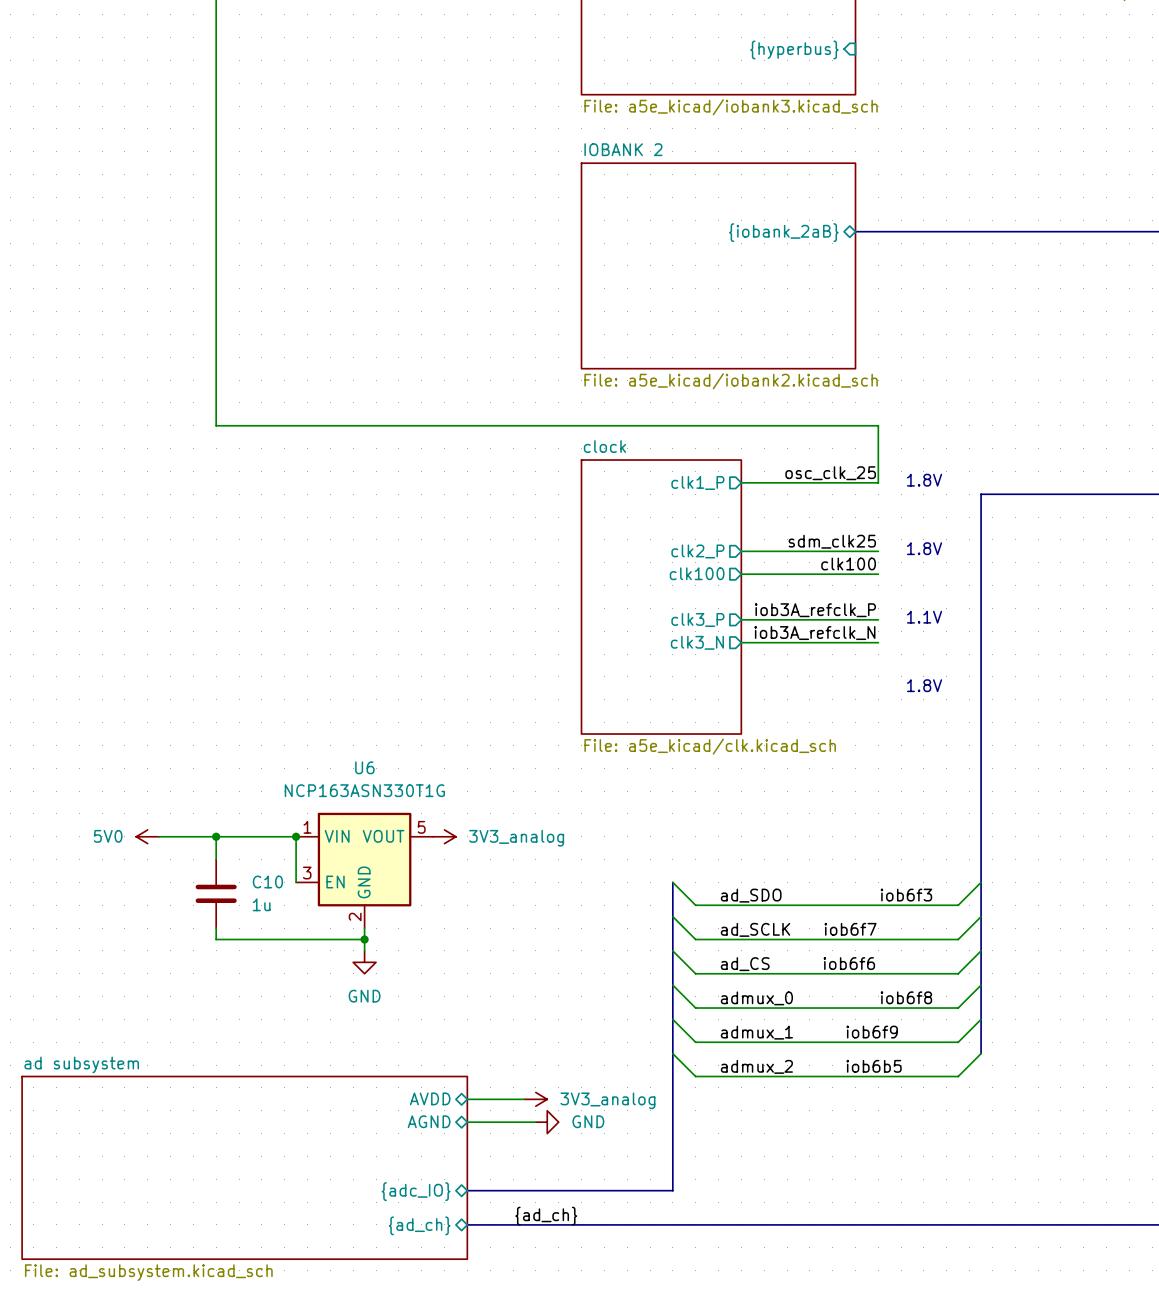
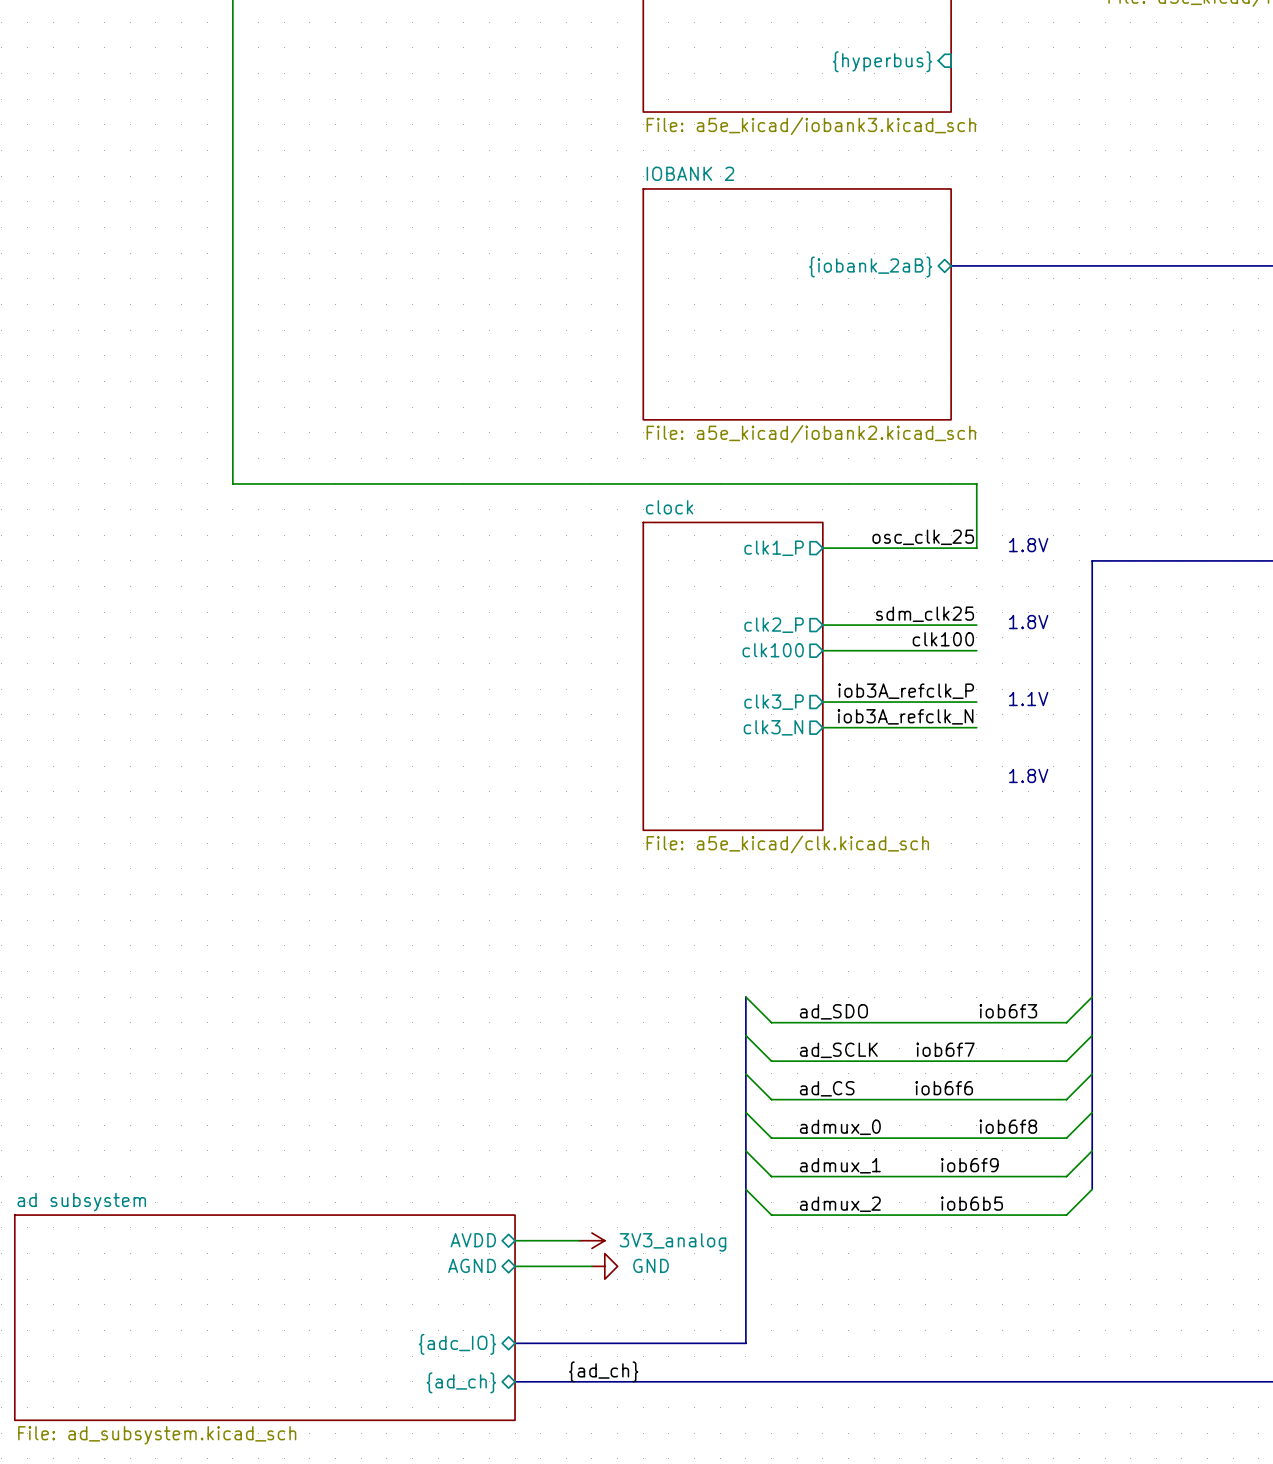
power symbol: 5V0 (147, 836) -> none
wire: (159, 836) (296, 836) (296, 882) -> none
wire: (216, 836) (216, 859) -> none
junction: (216, 836) -> none
junction: (296, 836) -> none
power symbol: 3V3_analog (444, 836) -> none
U6: NCP163ASN330T1G (364, 870) -> none
C10: 1u (216, 893) -> none
wire: (216, 928) (216, 939) (364, 939) -> none
wire: (364, 928) (364, 950) -> none
junction: (364, 939) -> none
power symbol: GND (364, 962) -> none

